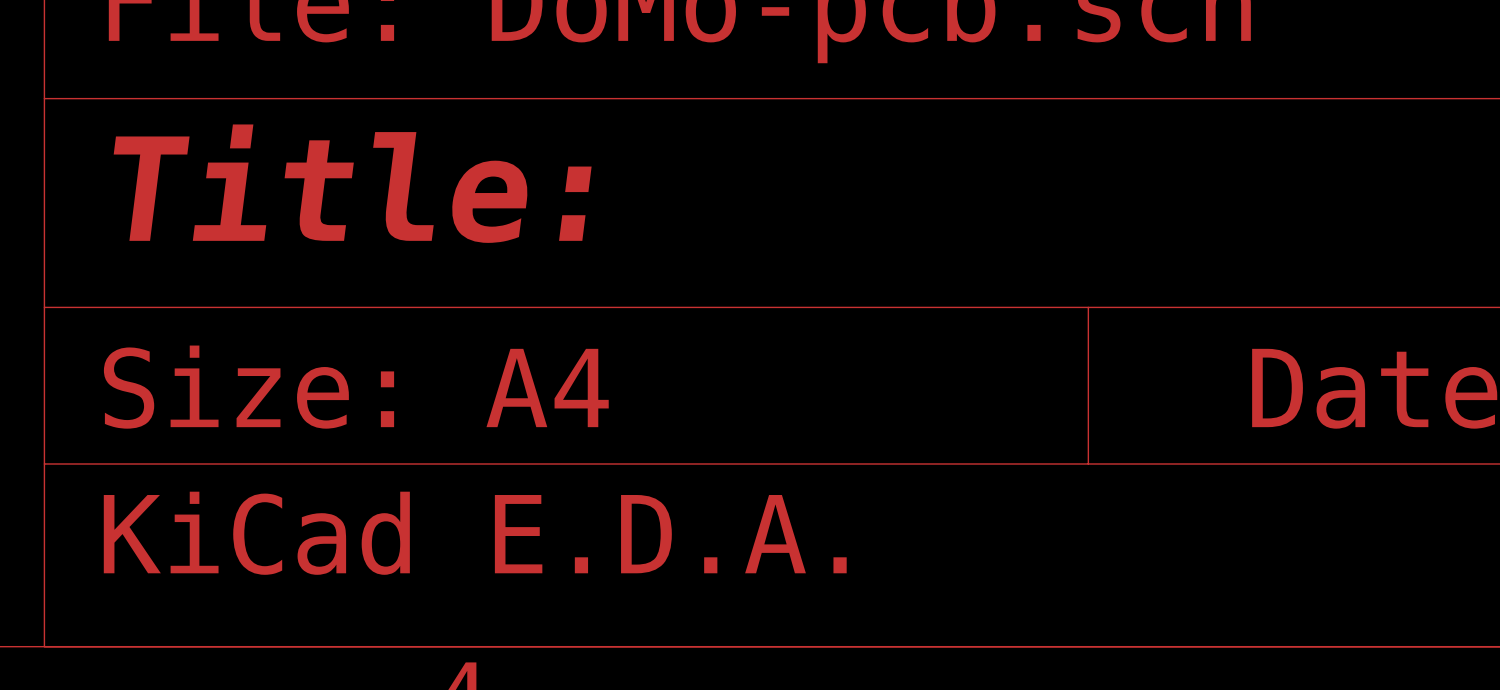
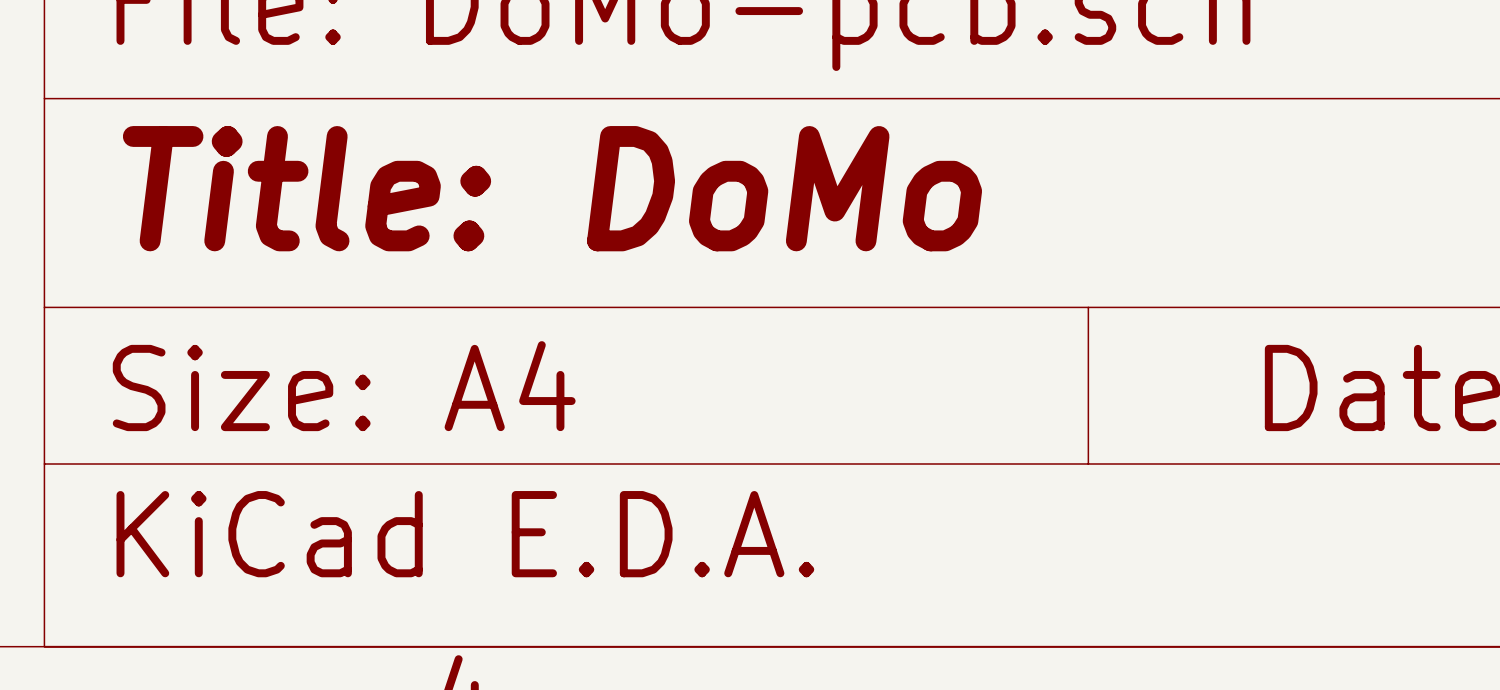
title block: Title: (352, 183) -> Title: DoMo (552, 188)

